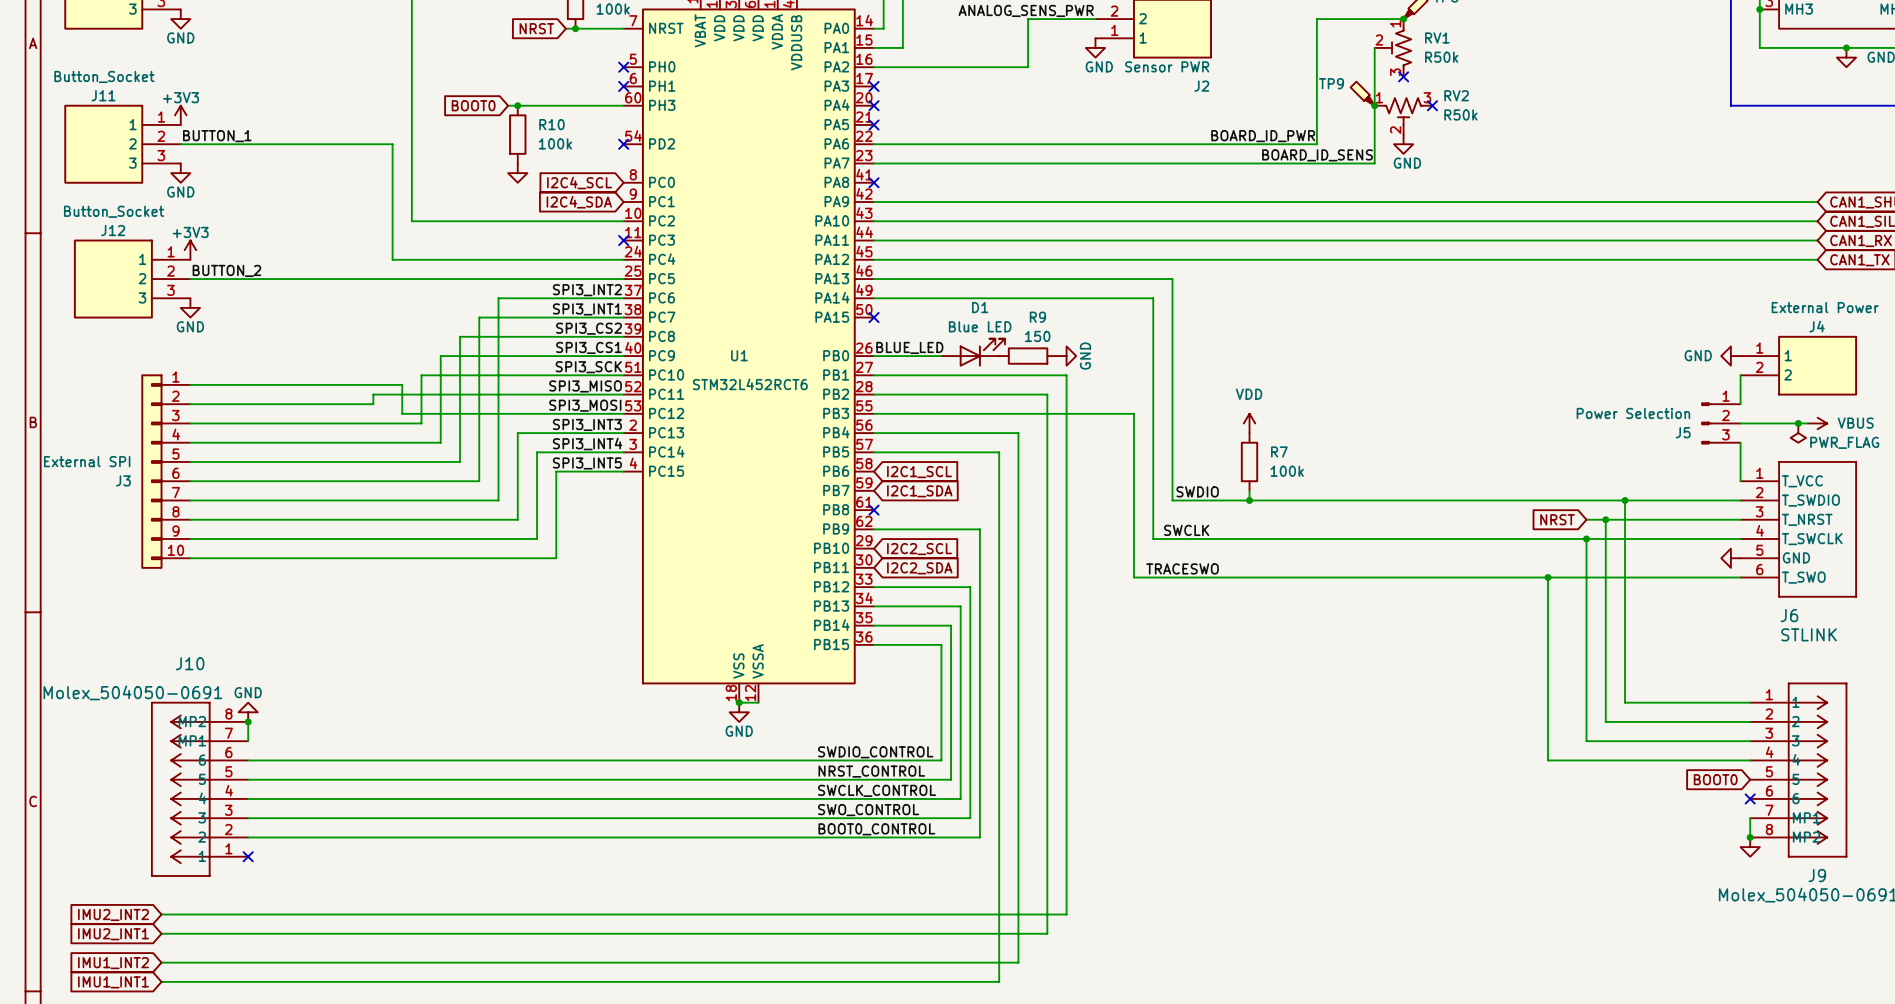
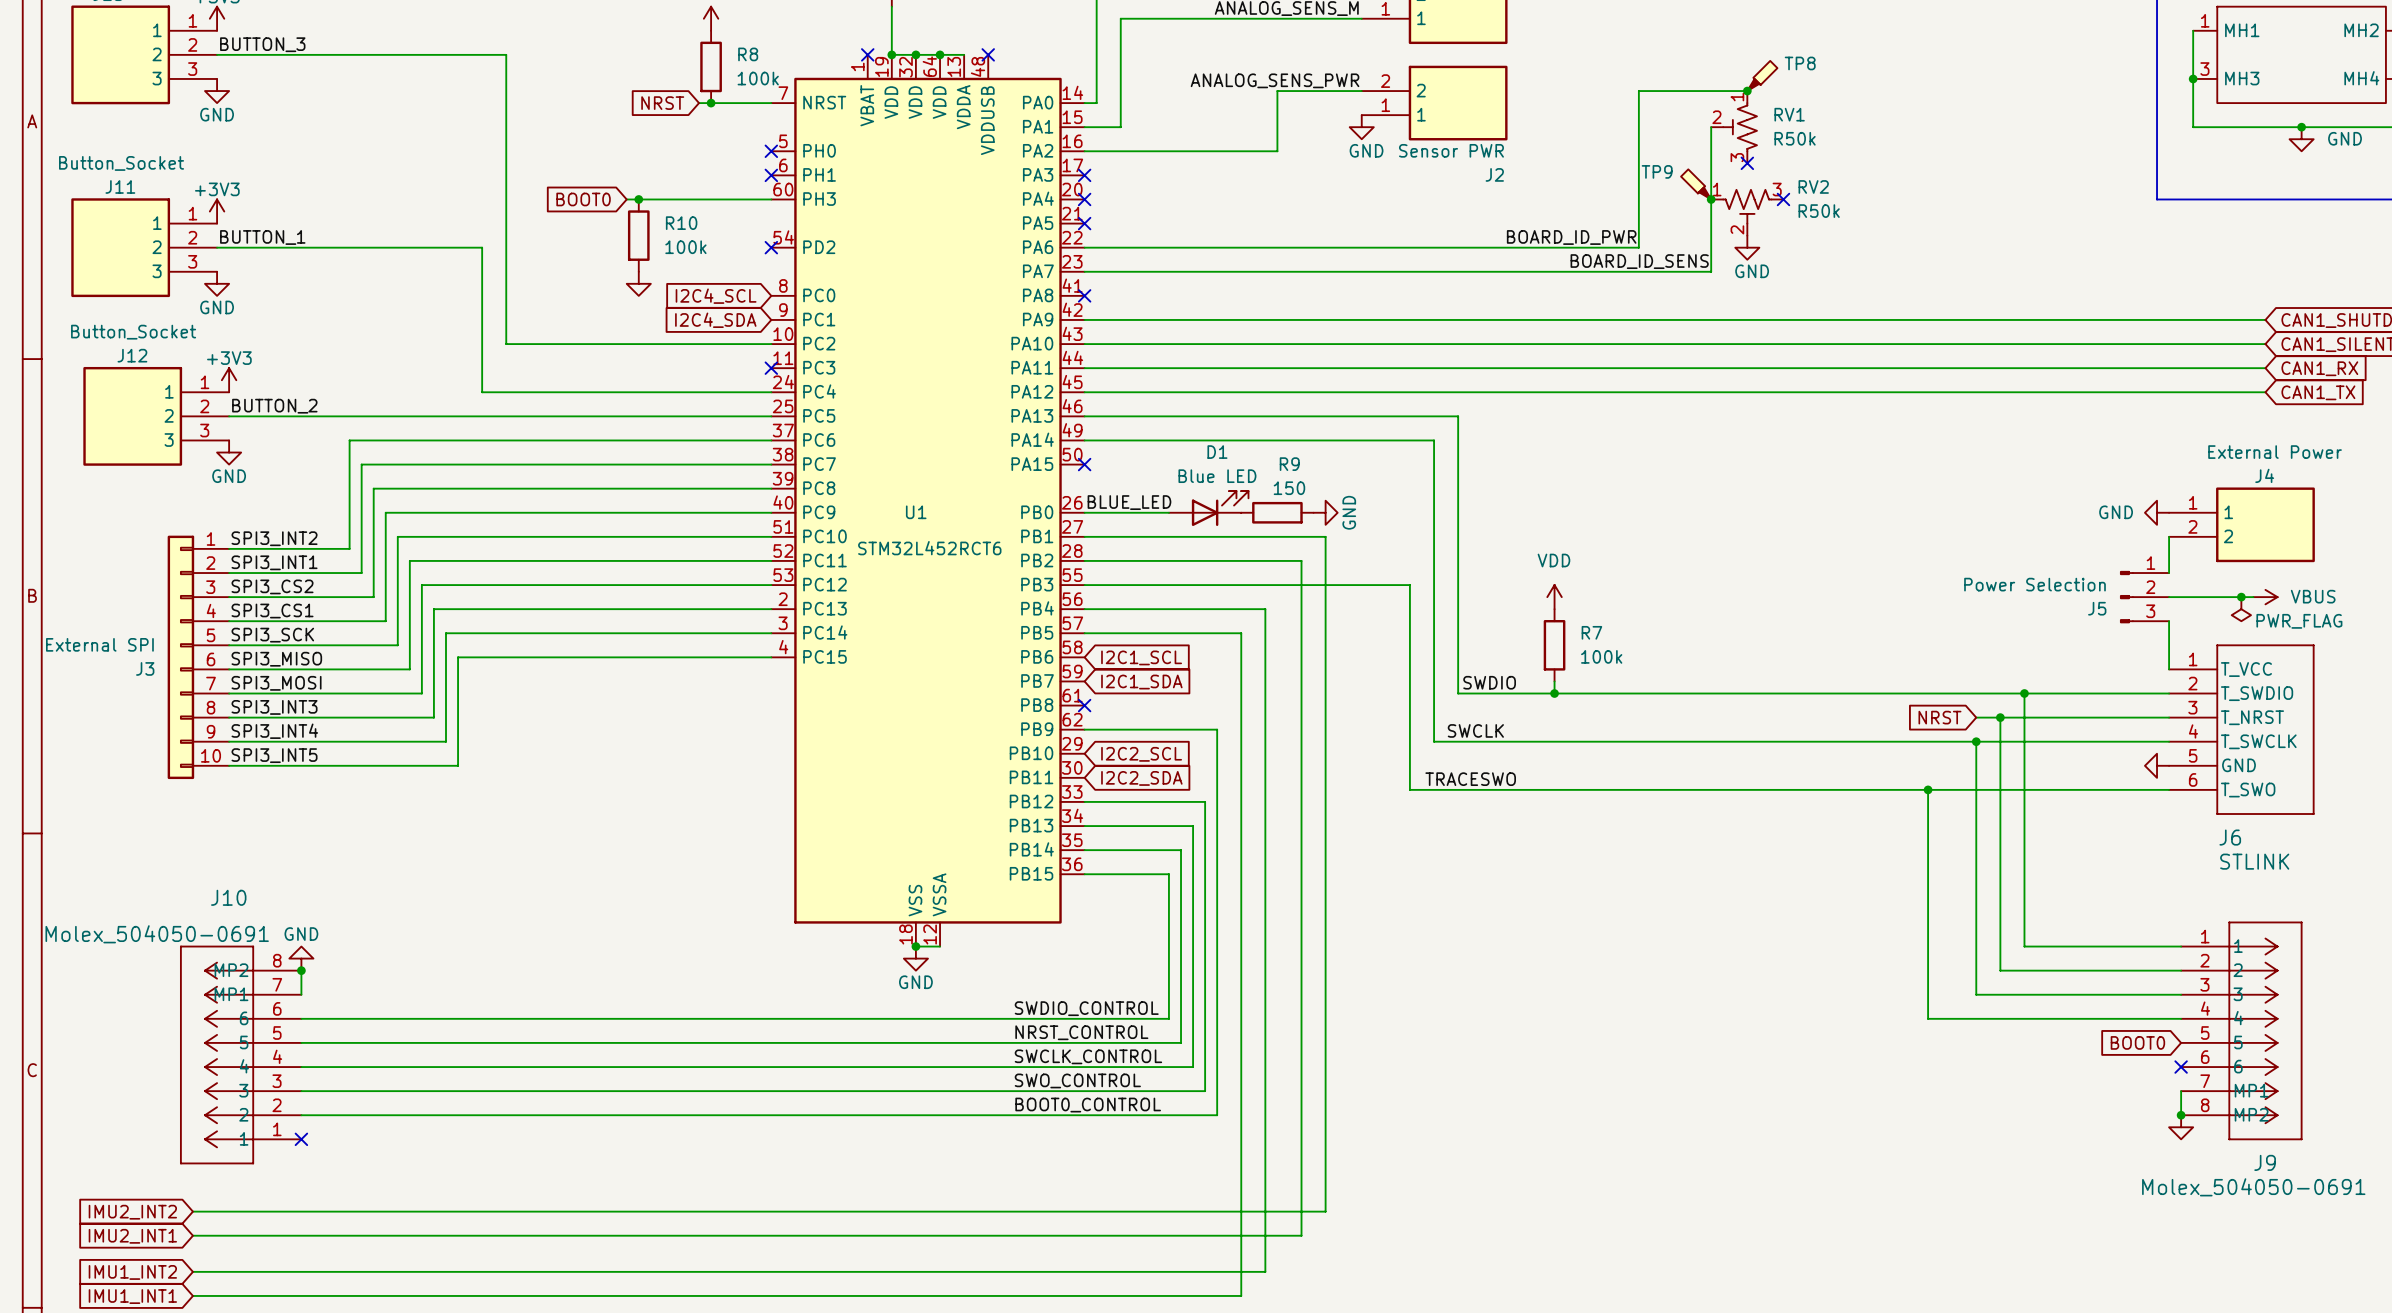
label: SPI3_INT2 (587, 290) -> none
wire: (498, 298) (498, 500) (344, 500) -> (614, 440) (349, 440) (349, 548)
label: SPI3_INT1 (587, 309) -> none
wire: (479, 317) (479, 481) (334, 481) -> (590, 464) (361, 464) (361, 573)
label: SPI3_CS2 (588, 328) -> none
wire: (460, 336) (460, 461) (325, 461) -> (566, 488) (373, 488) (373, 597)
label: SPI3_CS1 (588, 347) -> none
wire: (440, 356) (440, 442) (315, 442) -> (542, 512) (385, 512) (385, 621)
label: SPI3_SCK (588, 367) -> none
wire: (421, 375) (421, 423) (305, 423) -> (518, 536) (397, 536) (397, 645)
label: none -> SPI3_INT2 (274, 538)
wire: (286, 384) (402, 384) (402, 413) -> (421, 693) (421, 585) (494, 585)
label: SPI3_MISO (585, 386) -> none
wire: (373, 394) (373, 404) (296, 404) -> (458, 560) (409, 560) (409, 669)
label: none -> SPI3_INT1 (274, 562)
label: SPI3_MOSI (585, 405) -> none
label: none -> SPI3_CS2 (272, 586)
label: SPI3_INT3 (587, 424) -> none
wire: (517, 433) (517, 519) (354, 519) -> (638, 609) (433, 609) (433, 717)
label: none -> SPI3_CS1 (272, 611)
label: SPI3_INT4 (587, 443) -> none
wire: (537, 452) (537, 539) (363, 539) -> (662, 633) (446, 633) (446, 741)
label: none -> SPI3_SCK (272, 635)
label: SPI3_INT5 (587, 463) -> none
wire: (556, 471) (556, 558) (373, 558) -> (686, 657) (458, 657) (458, 765)
label: none -> SPI3_MISO (276, 659)
label: none -> SPI3_MOSI (276, 683)
label: none -> SPI3_INT3 (274, 707)
label: none -> SPI3_INT4 (274, 731)
label: none -> SPI3_INT5 (274, 755)

